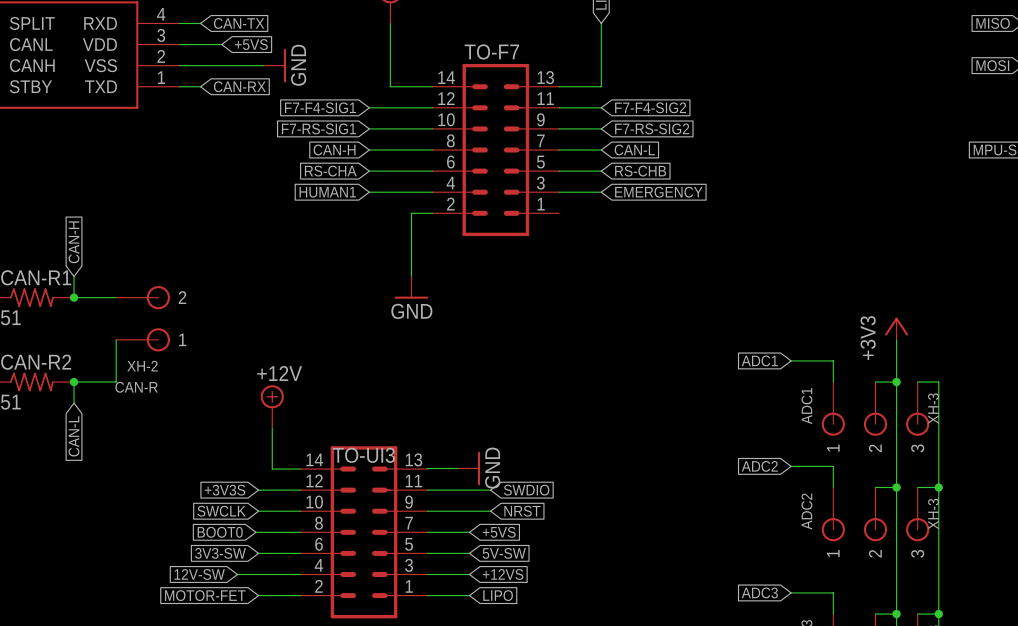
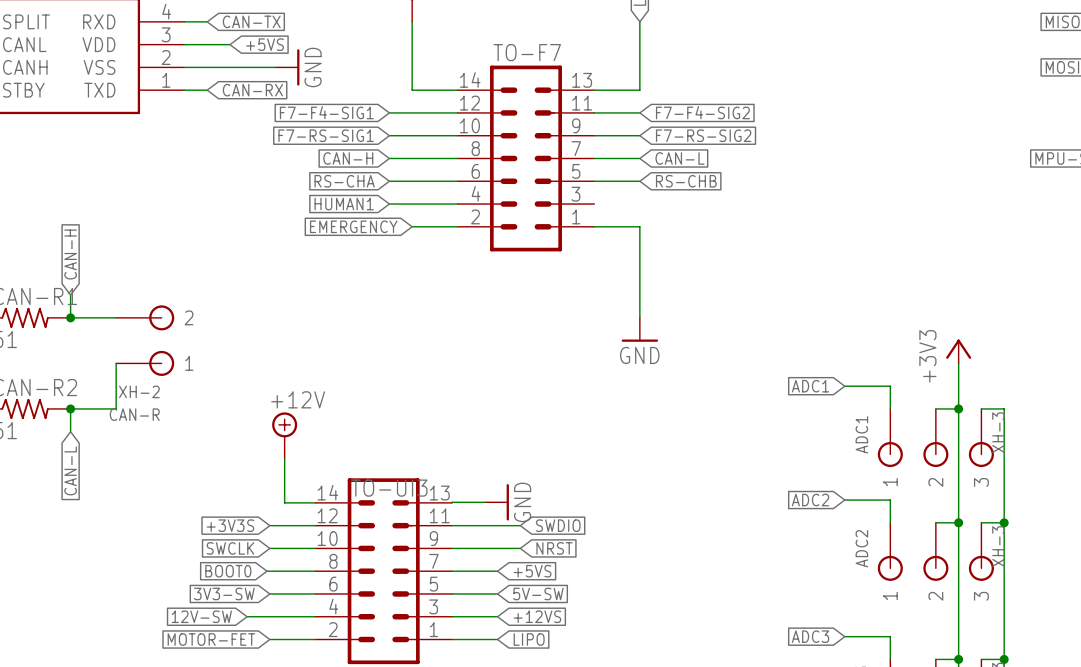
wire: (559, 192) (601, 192) -> none
global label: EMERGENCY (658, 192) -> none
global label: none -> EMERGENCY (353, 226)
wire: (411, 213) (411, 276) -> (434, 226) (412, 226)
wire: none -> (594, 226) (639, 226) (639, 317)
power symbol position: GND (411, 287) -> GND (639, 329)

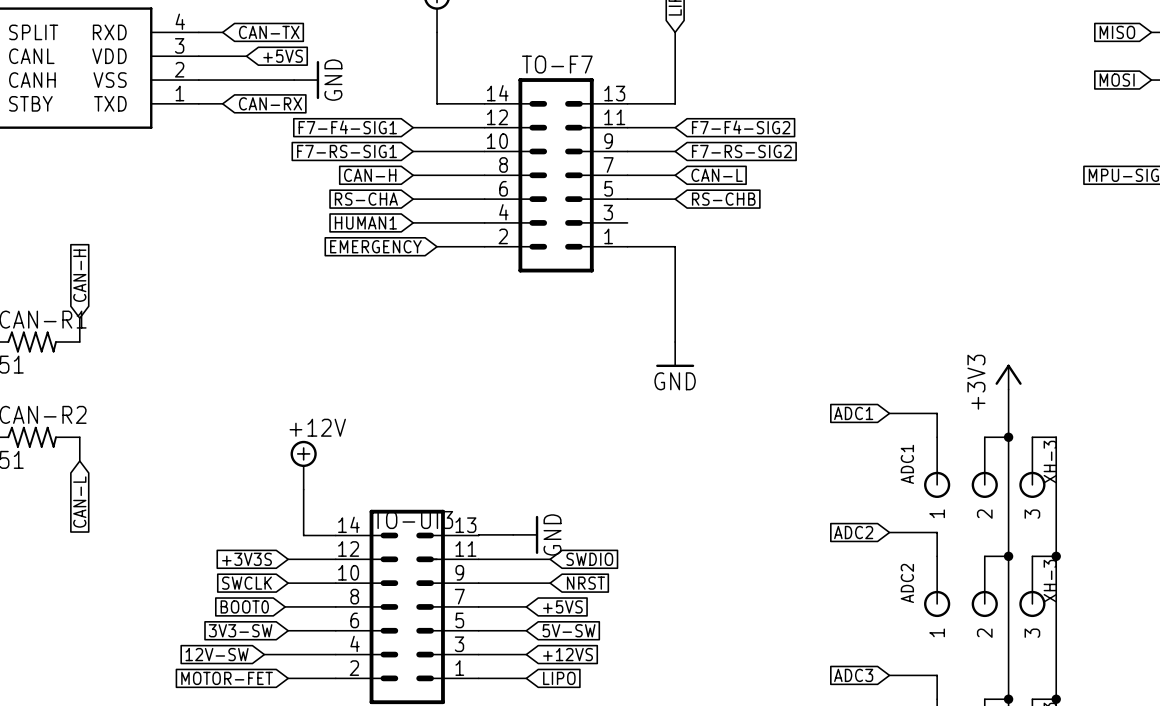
wire: (70, 317) (116, 317) -> none
junction: (70, 317) -> none
CAN-R: XH-2 (145, 340) -> none
wire: (116, 363) (116, 408) (70, 408) -> none
junction: (70, 408) -> none

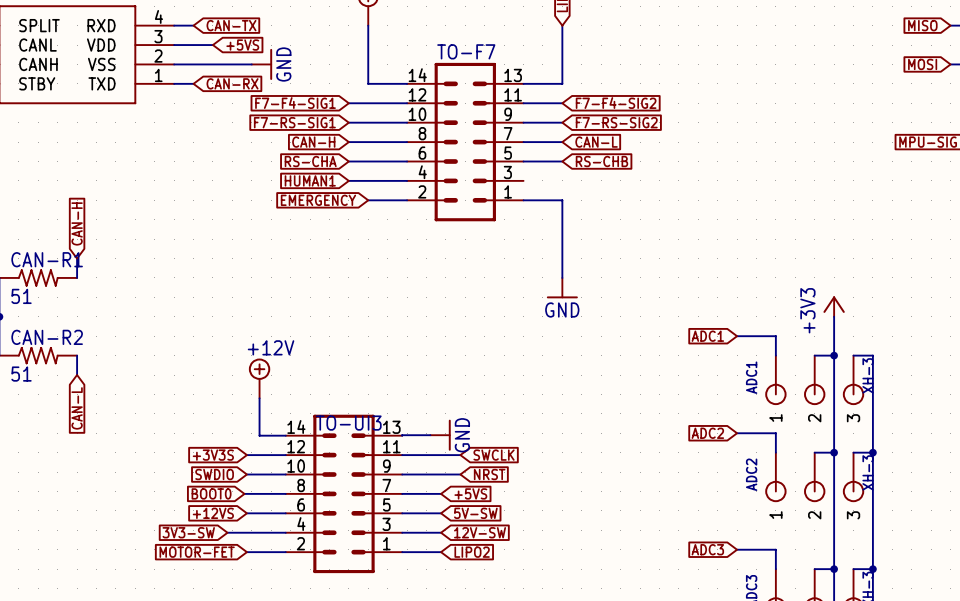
global label: SWDIO (589, 559) -> SWCLK (494, 455)
global label: SWCLK (246, 583) -> SWDIO (214, 474)
global label: 3V3-SW (240, 630) -> +12VS (213, 513)
global label: 12V-SW (217, 654) -> 3V3-SW (188, 532)
global label: +12VS (568, 654) -> 12V-SW (480, 532)
global label: LIPO (559, 678) -> LIPO2 (472, 552)

